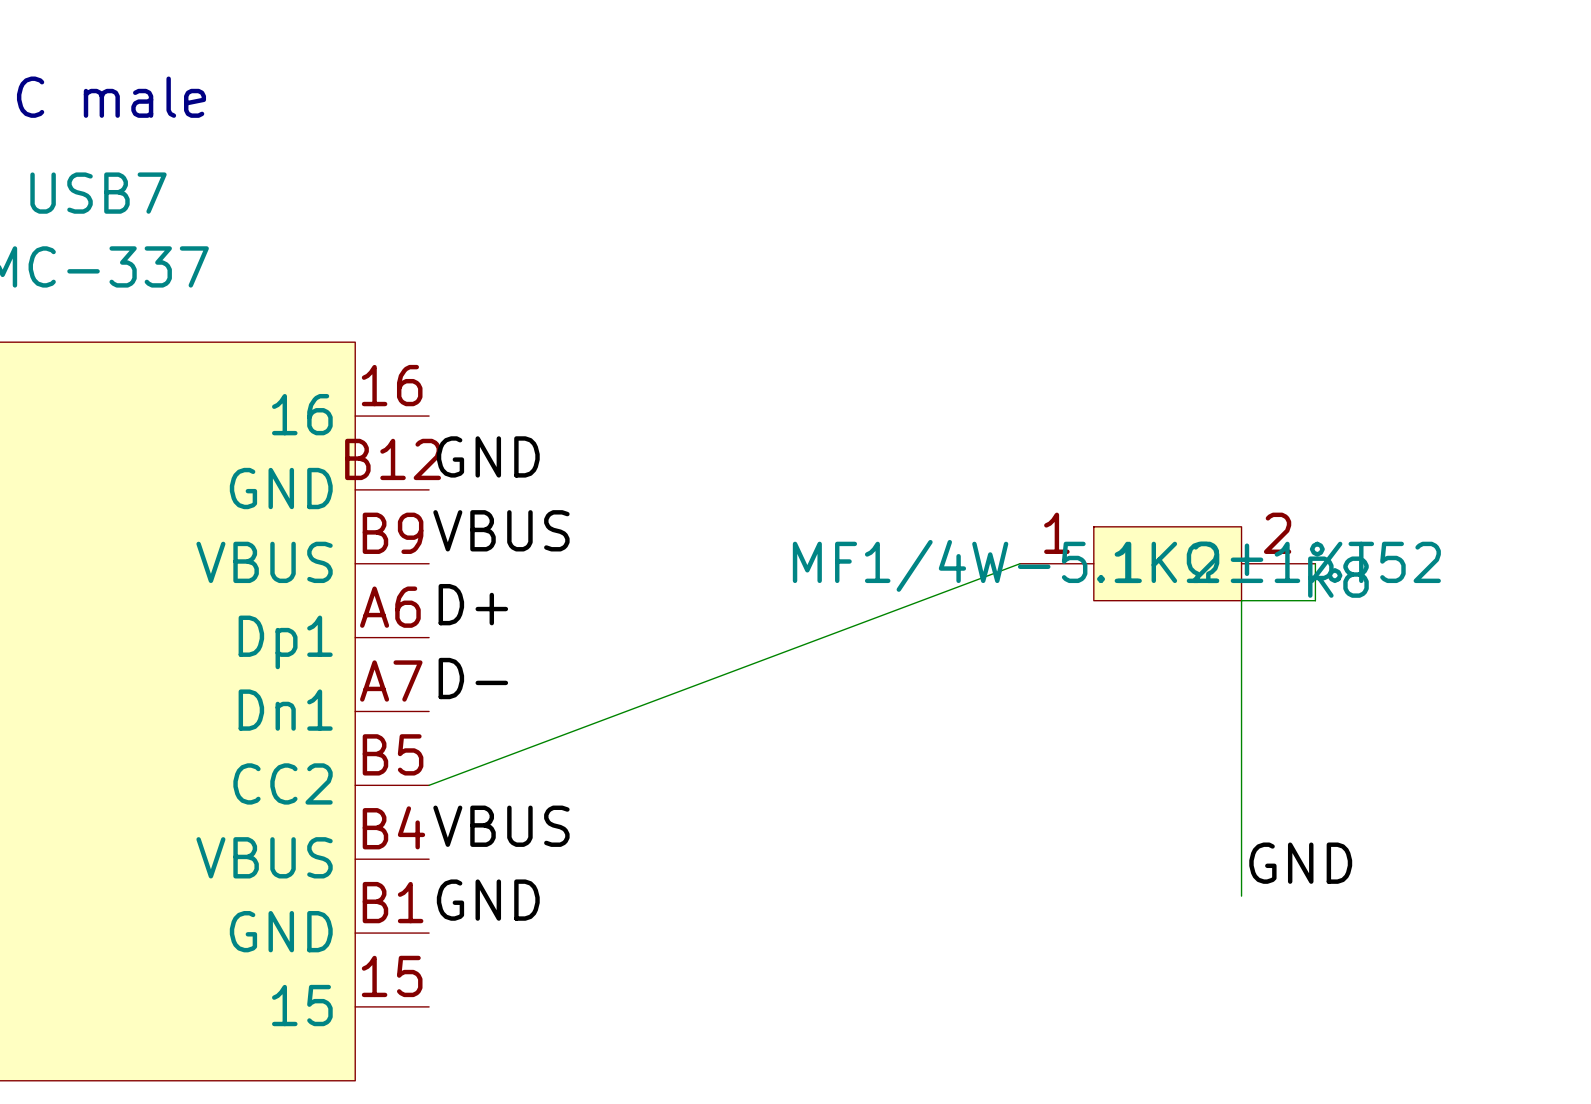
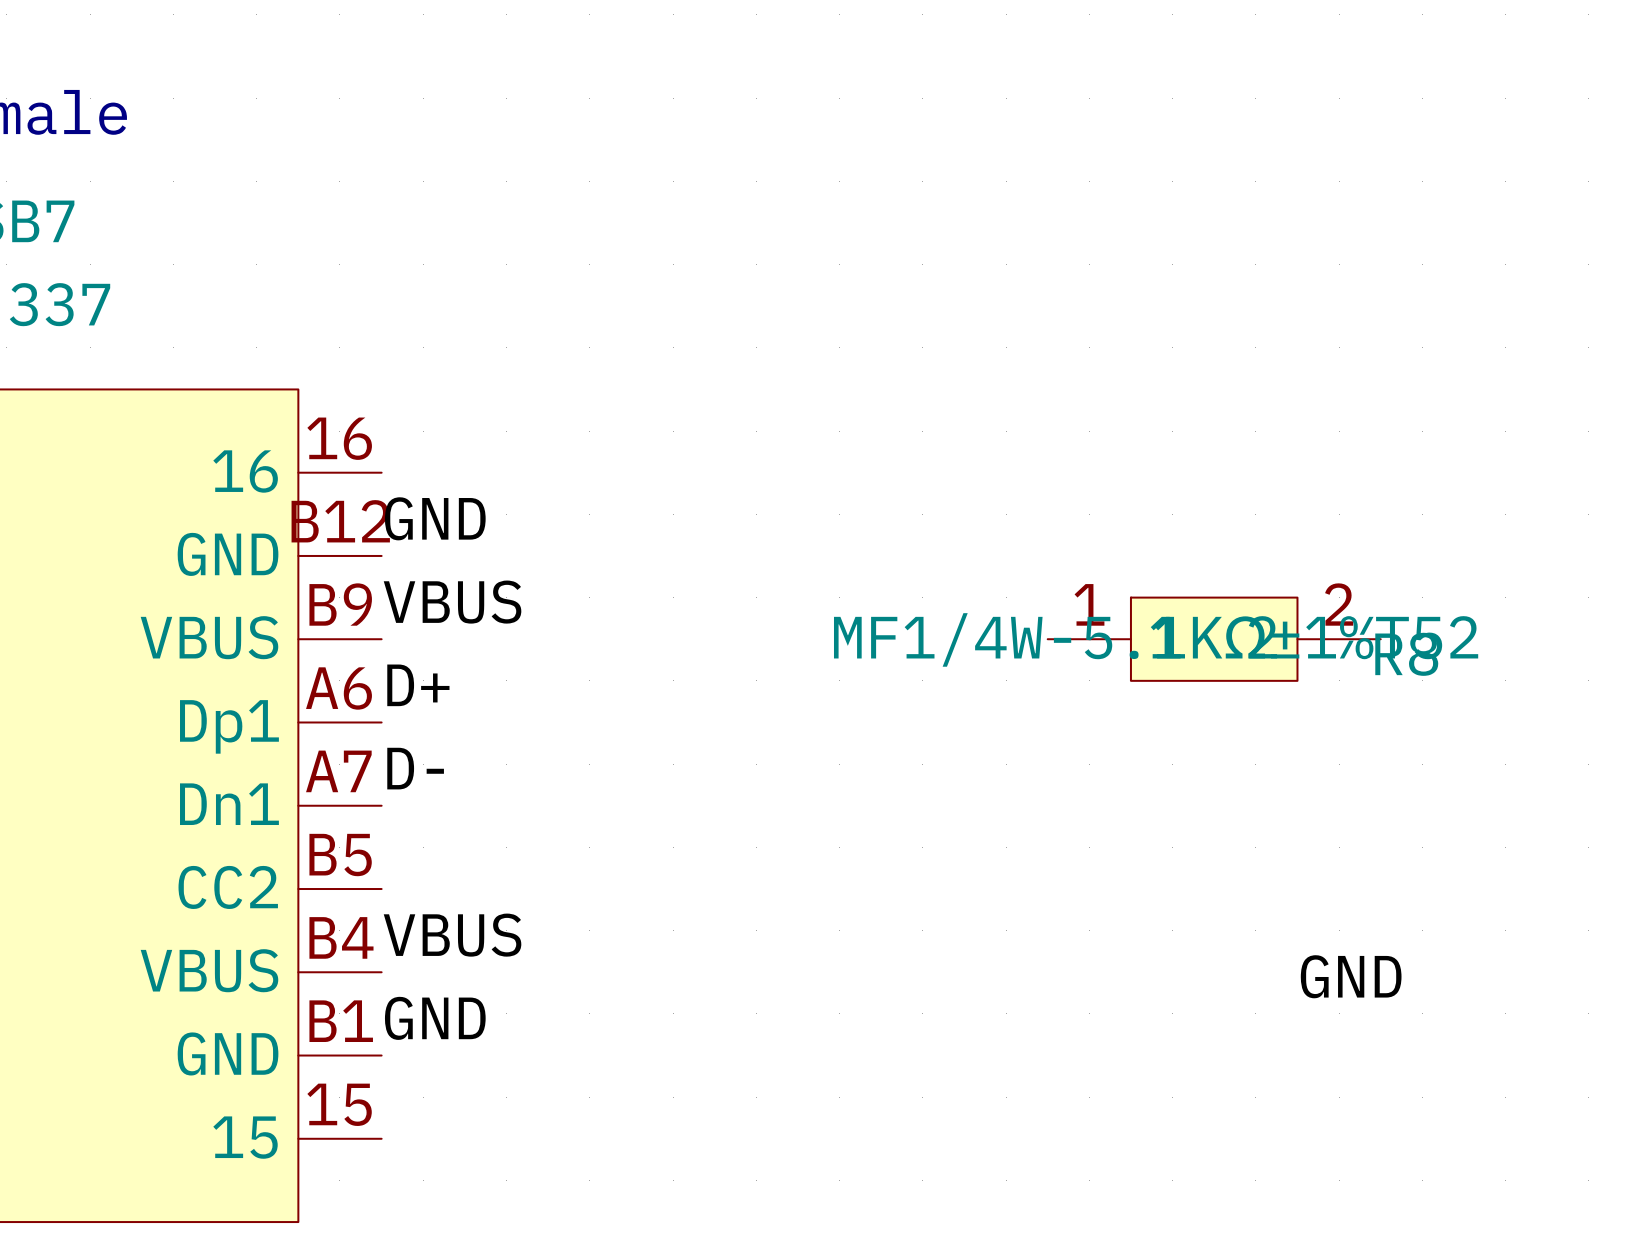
wire: (1019, 563) (429, 785) -> none
wire: (1315, 563) (1315, 600) (1241, 600) (1241, 896) -> none

